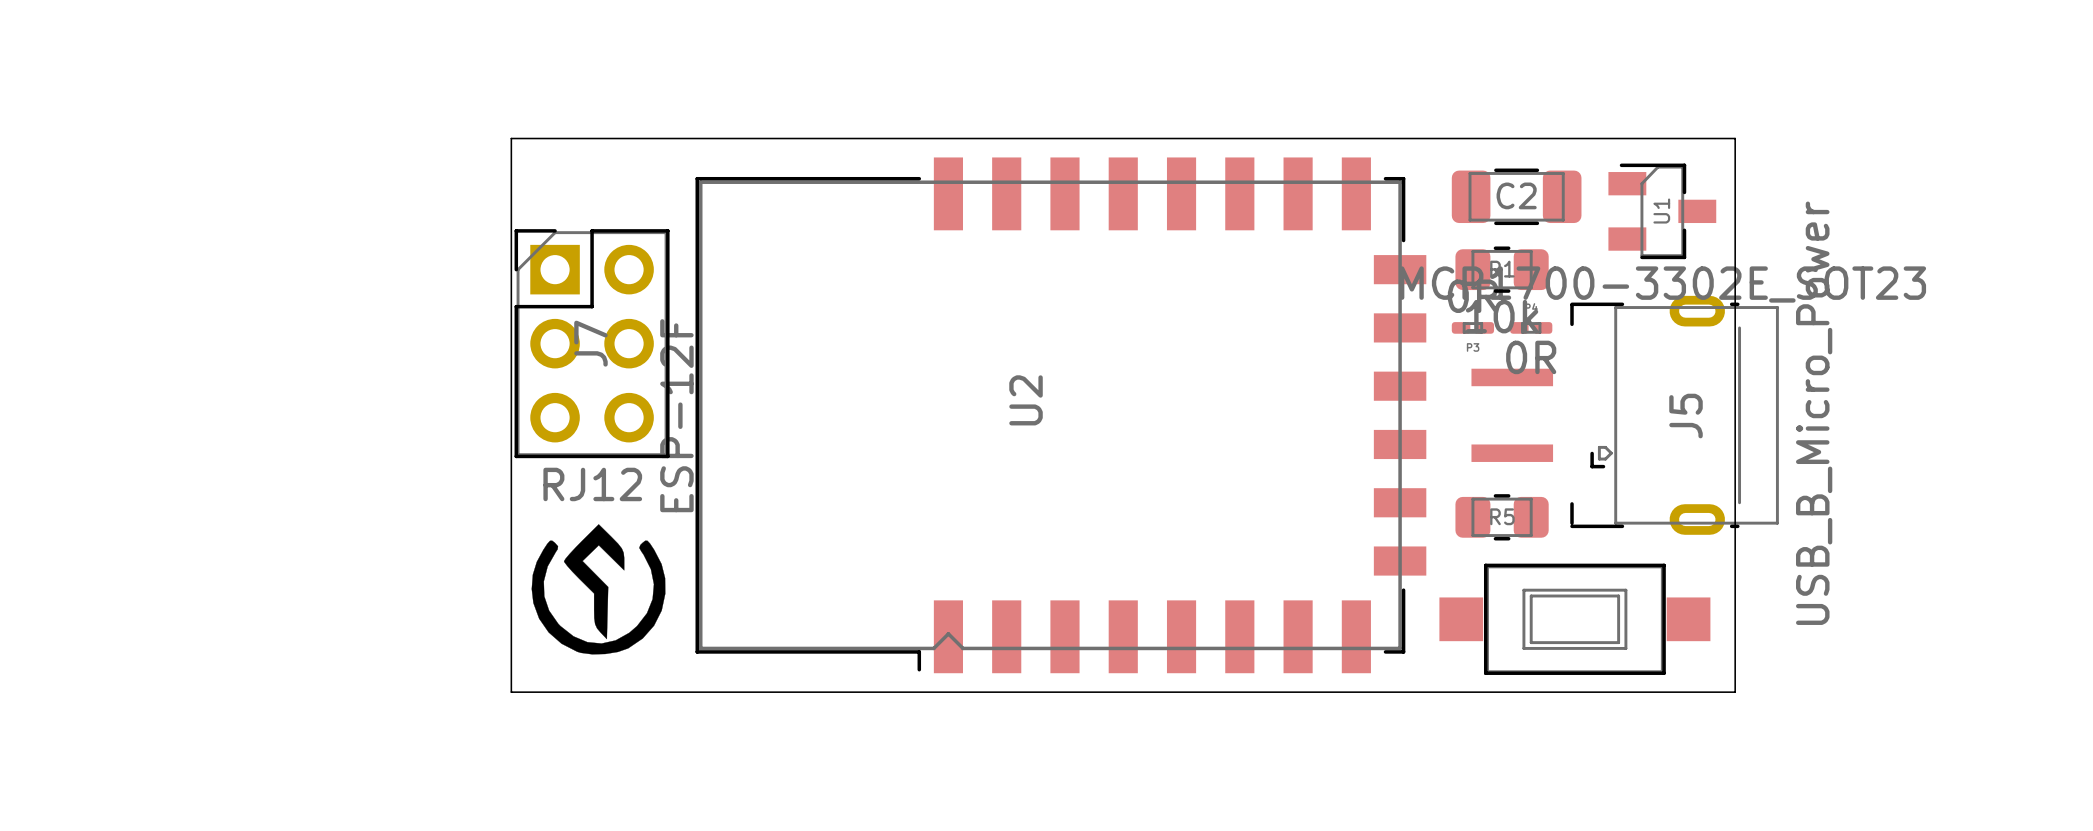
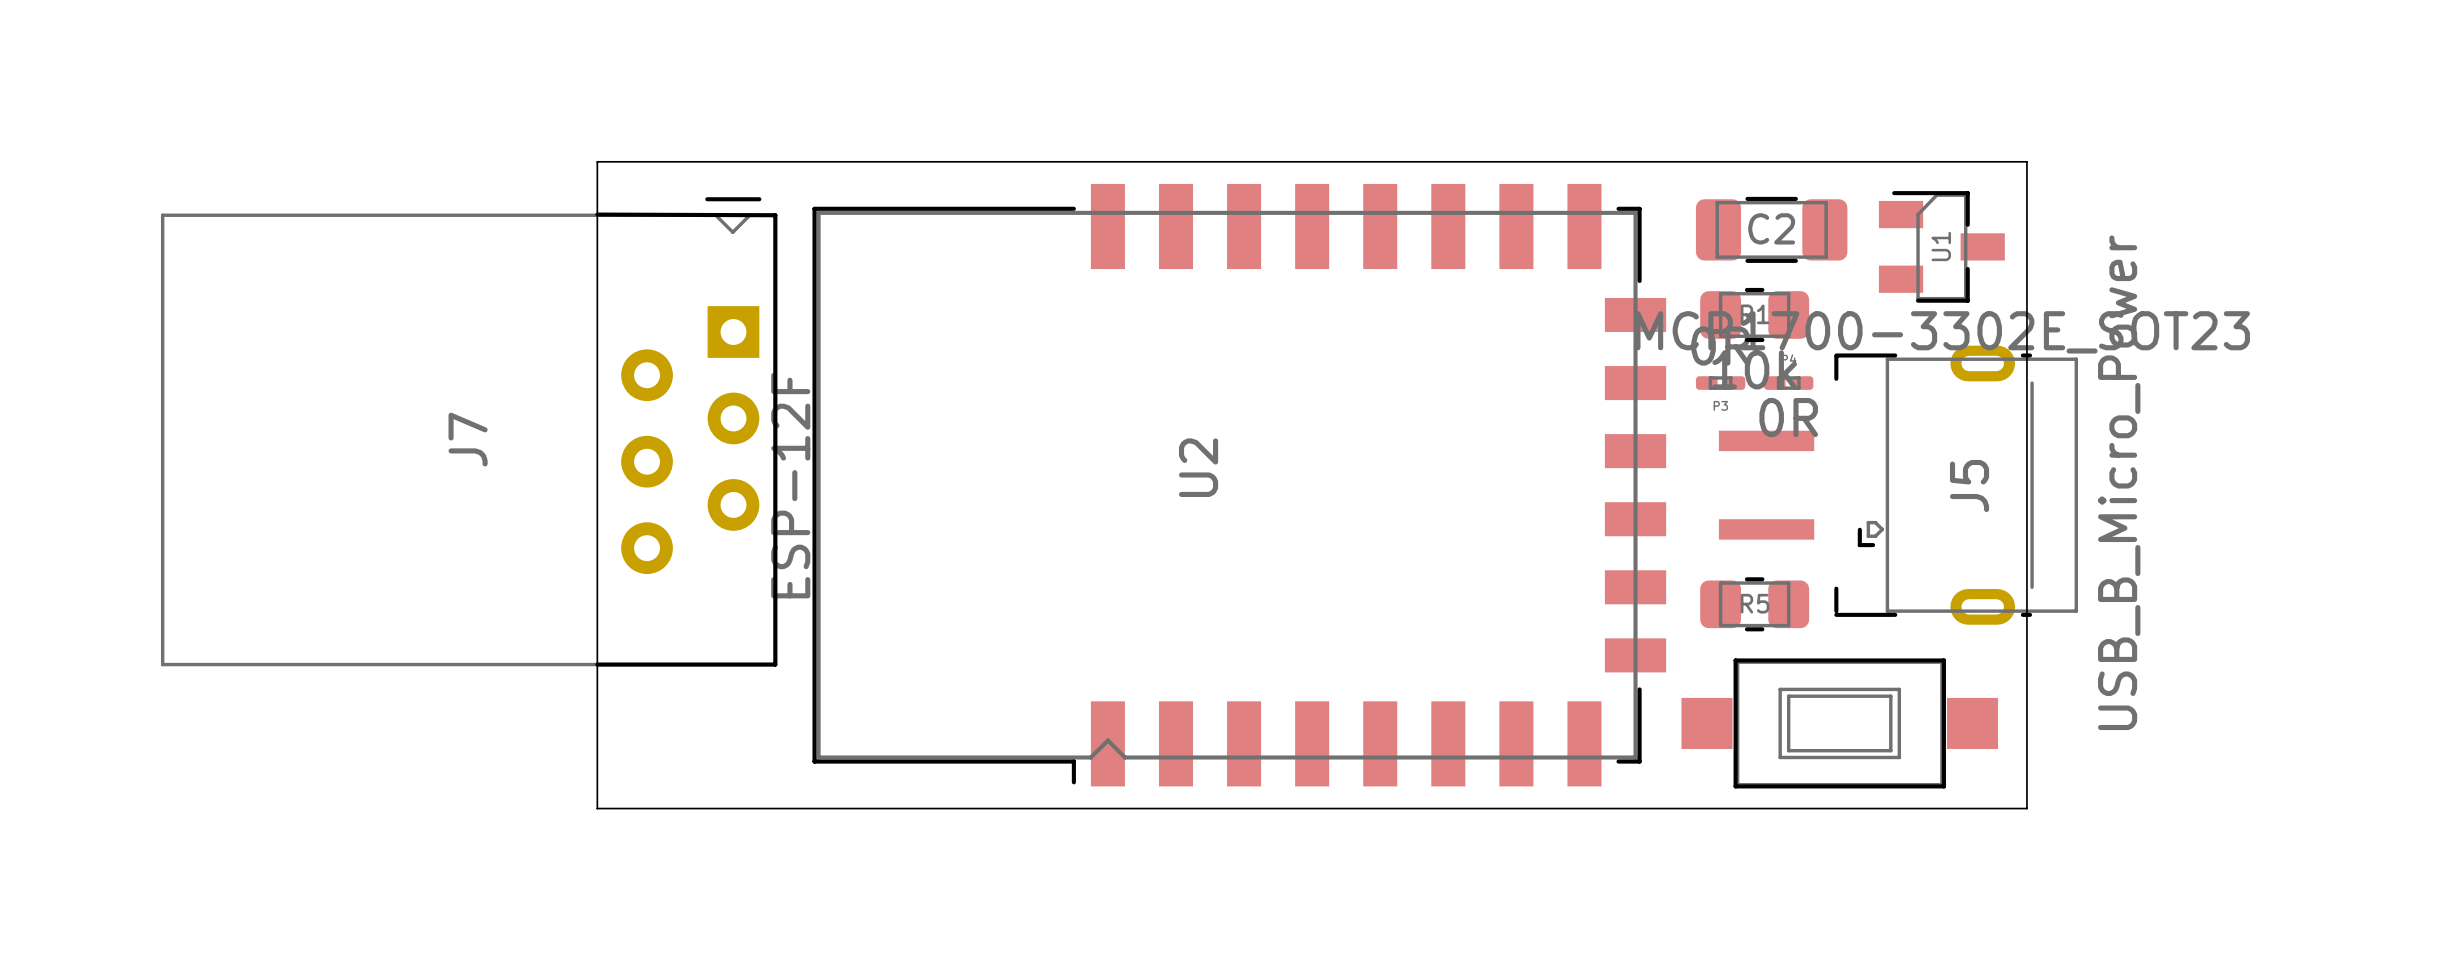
J7 footprint: [514, 229, 670, 459] -> [160, 197, 778, 667]
J7 value: RJ12 (592, 484) -> none
drawing: [531, 524, 666, 655] -> none

